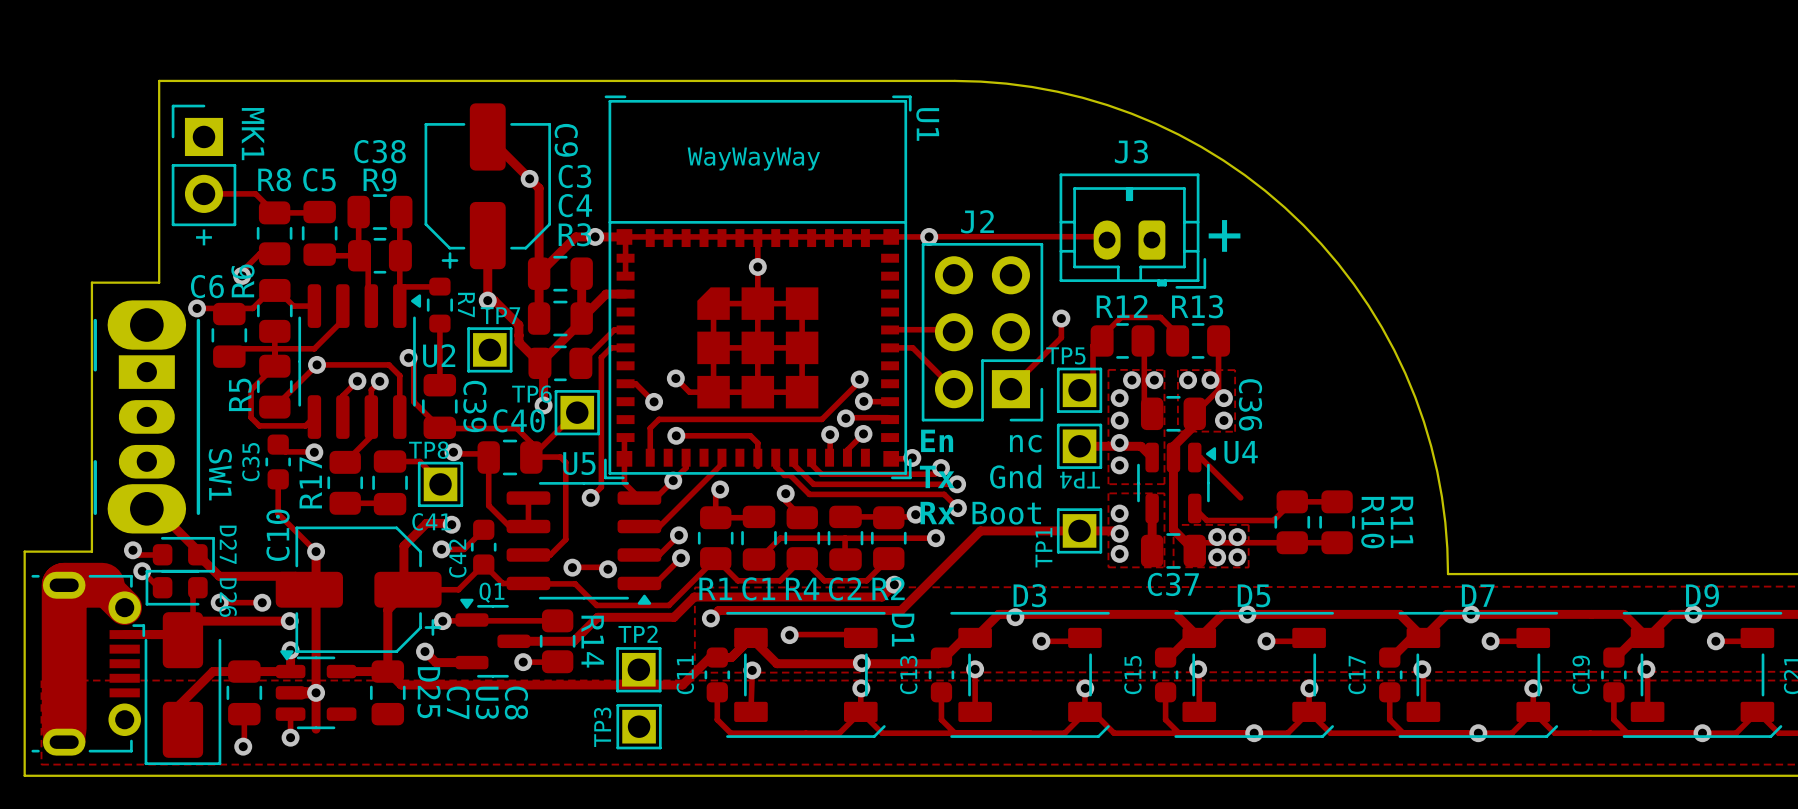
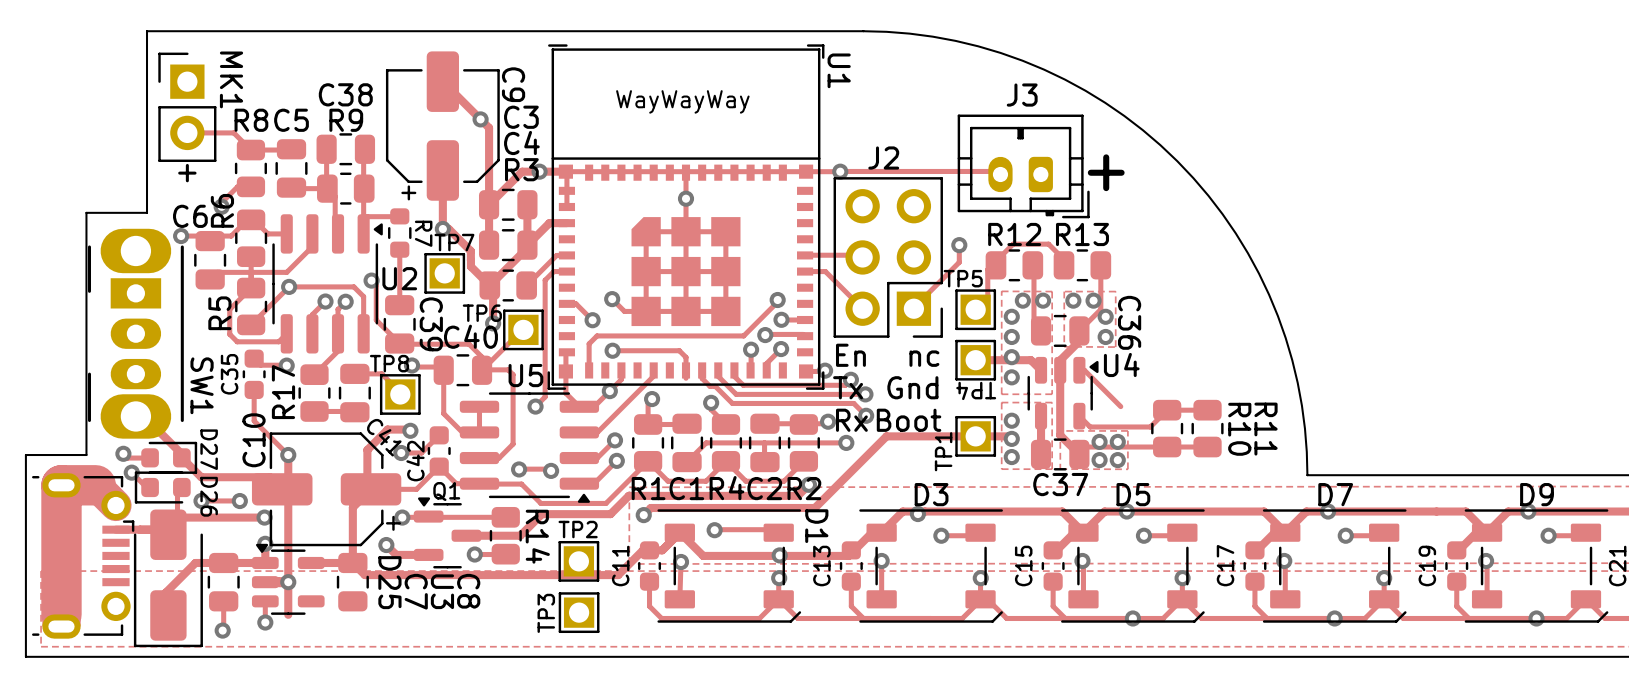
C41 name rotation: 0° (431, 521) -> 45° clockwise (384, 437)

